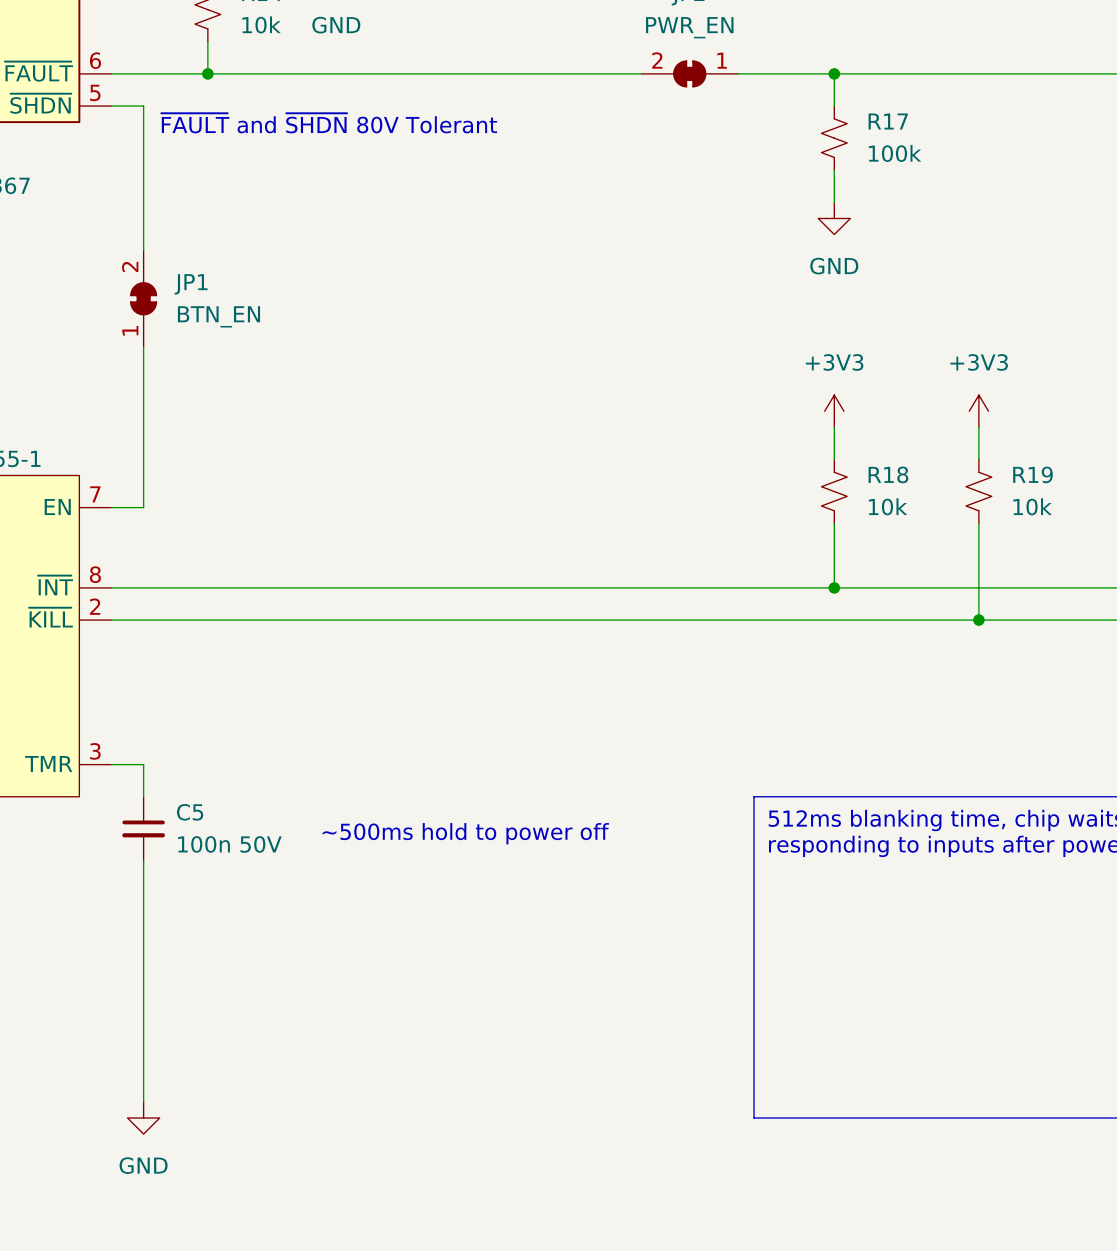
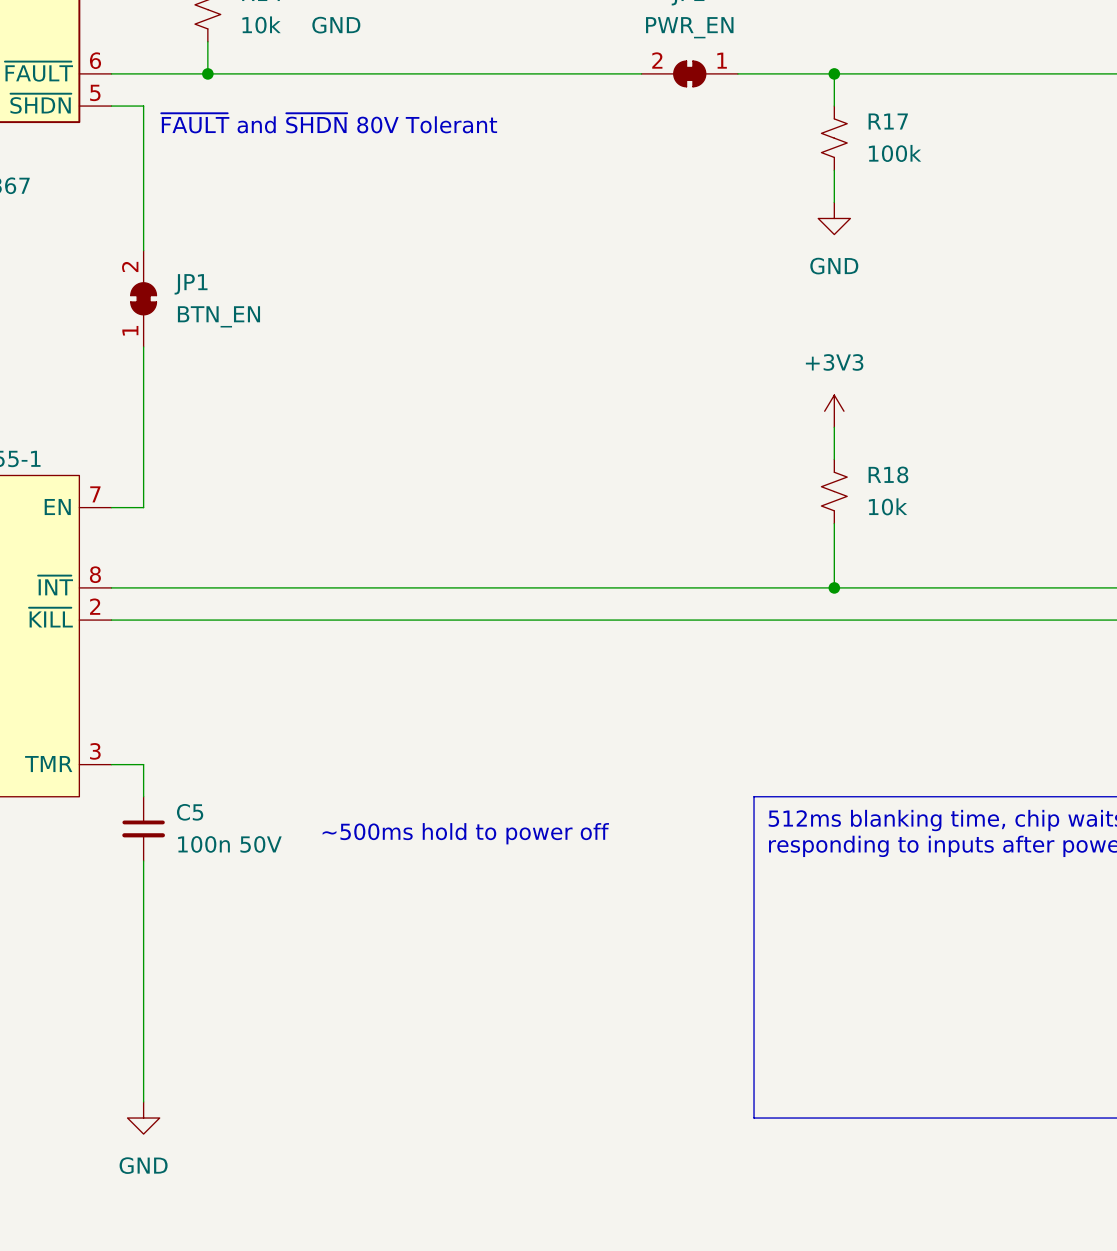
power symbol: +3V3 (978, 411) -> none
wire: (978, 427) (978, 459) -> none
R19: 10k (978, 491) -> none
wire: (978, 523) (978, 620) -> none
junction: (978, 620) -> none

